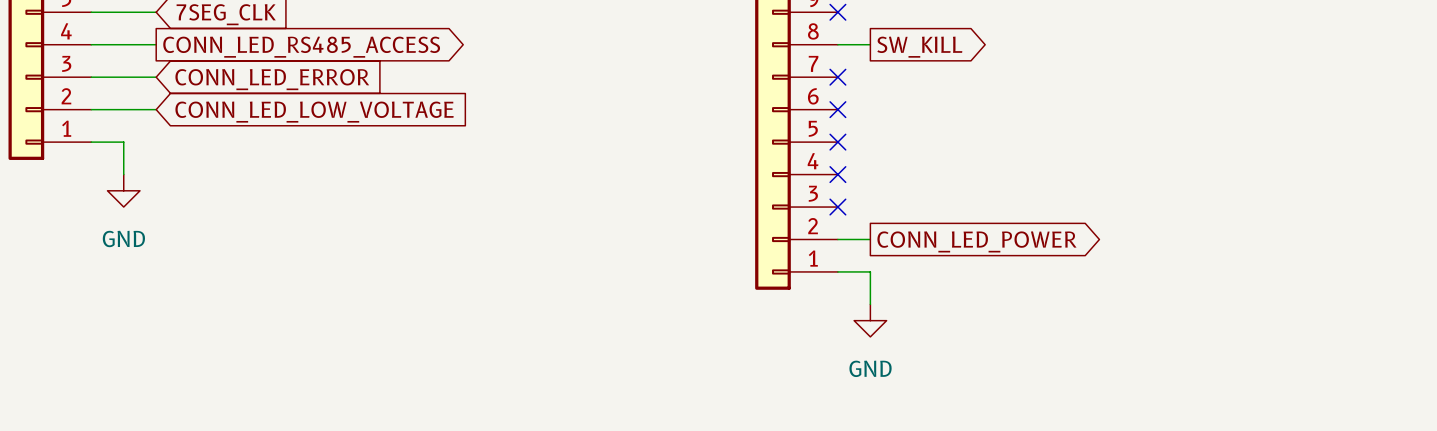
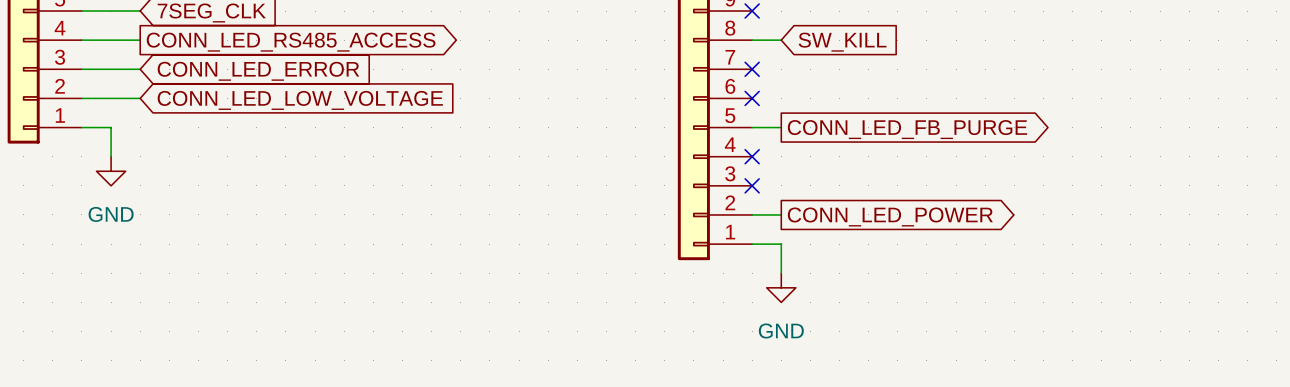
global label shape: output (919, 47) -> input (842, 42)
wire: none -> (752, 127) (781, 127)
no-connect mark: (837, 142) -> none
global label: none -> CONN_LED_FB_PURGE (907, 129)

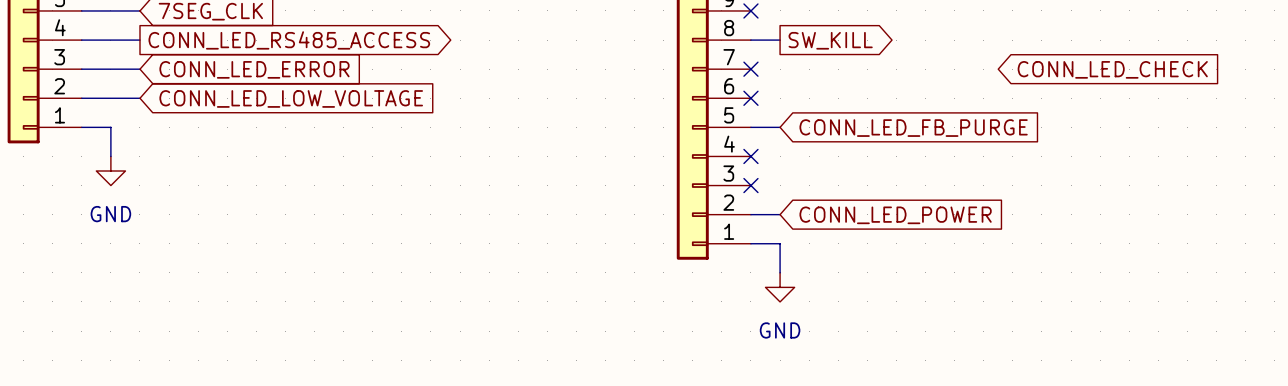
global label shape: input (842, 42) -> output (830, 40)
global label: none -> CONN_LED_CHECK (1112, 69)
global label shape: output (907, 129) -> input (913, 128)
global label shape: output (890, 216) -> input (895, 215)

